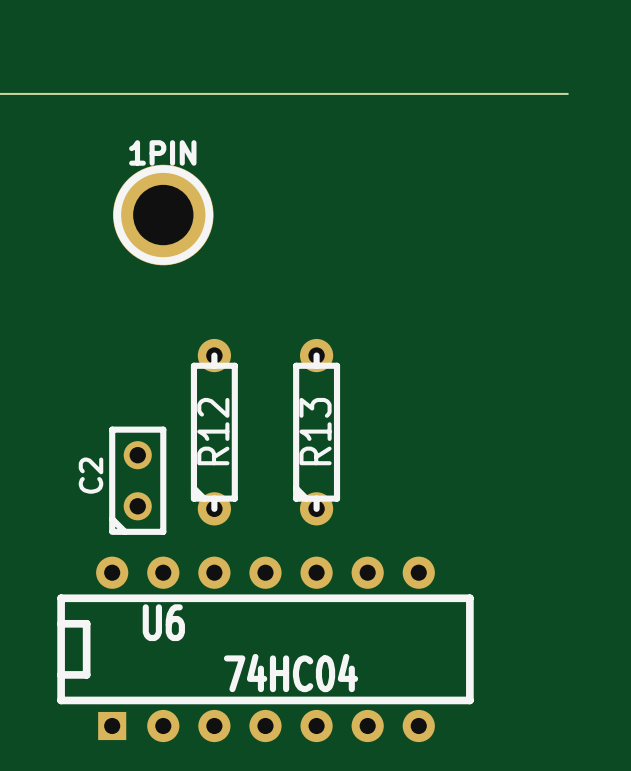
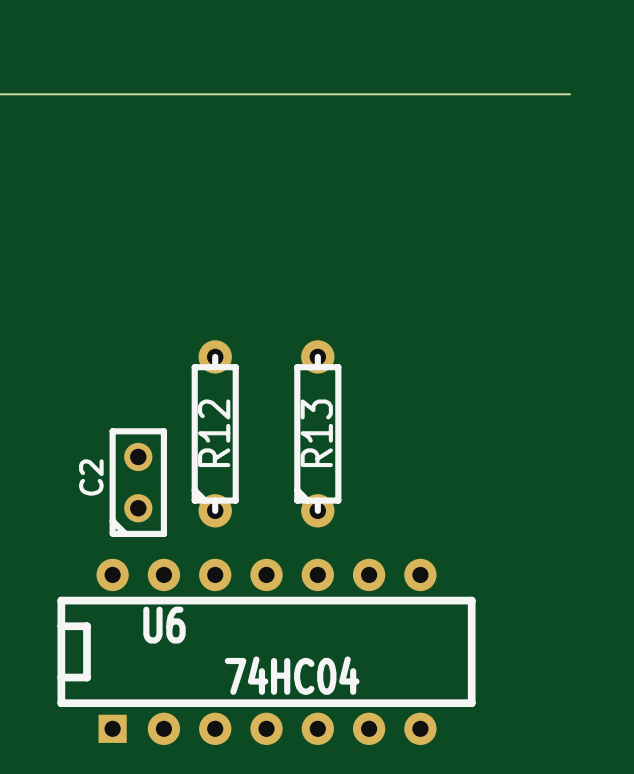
1PIN: (163, 215) -> none

